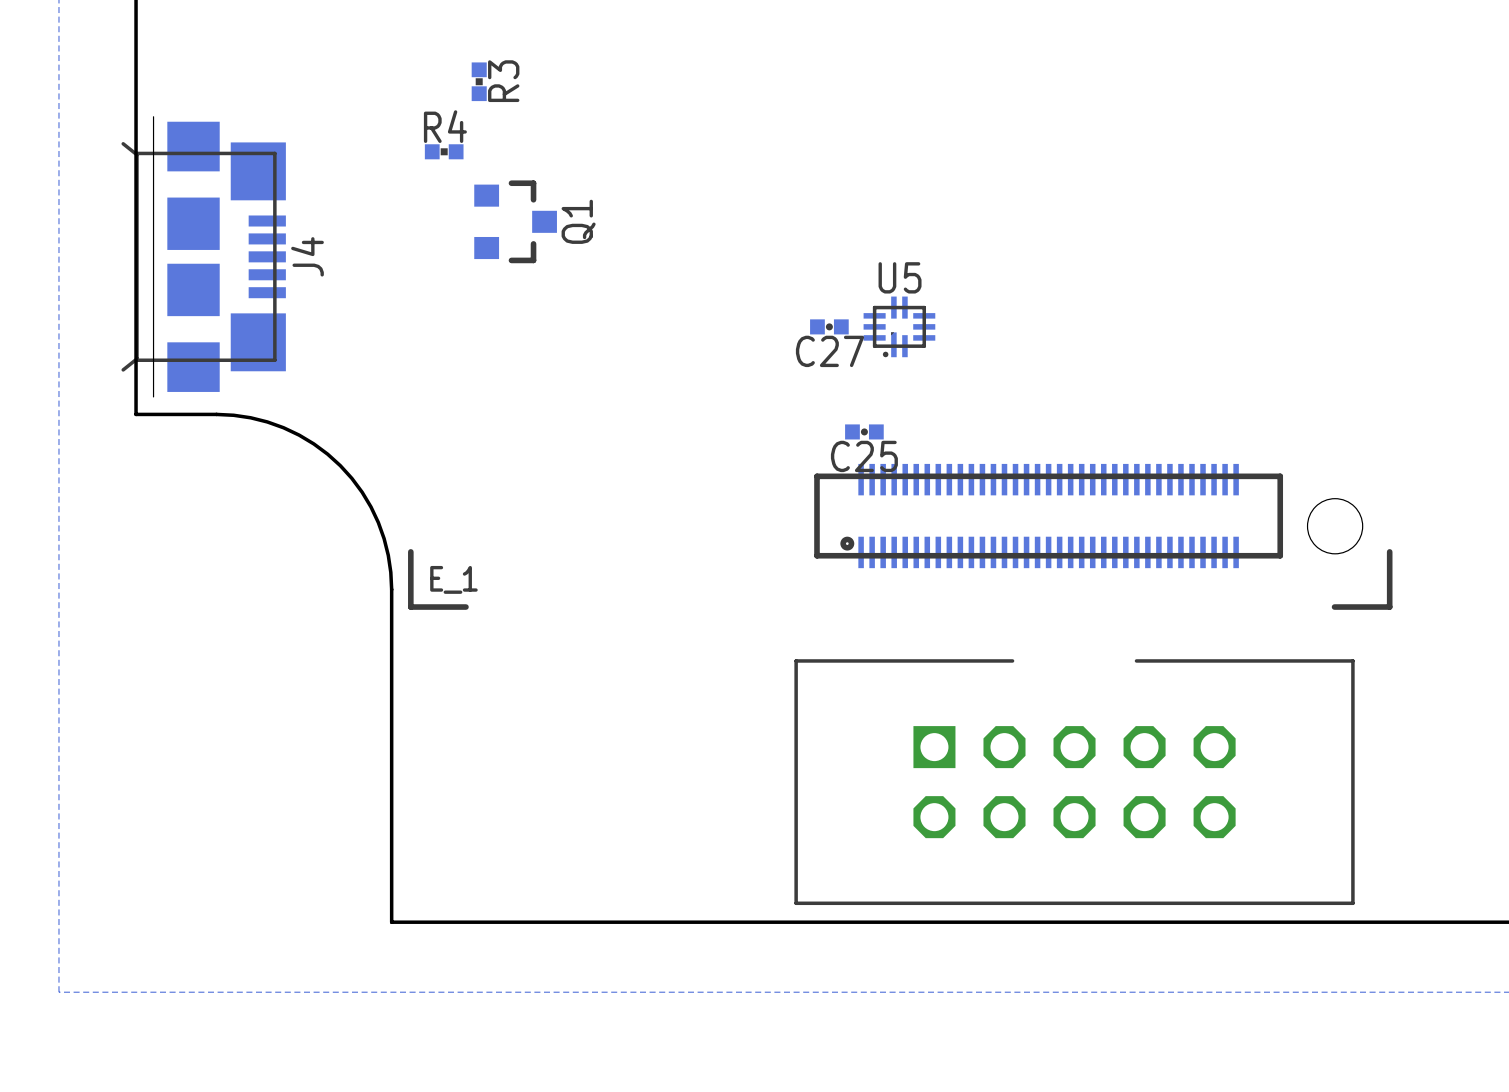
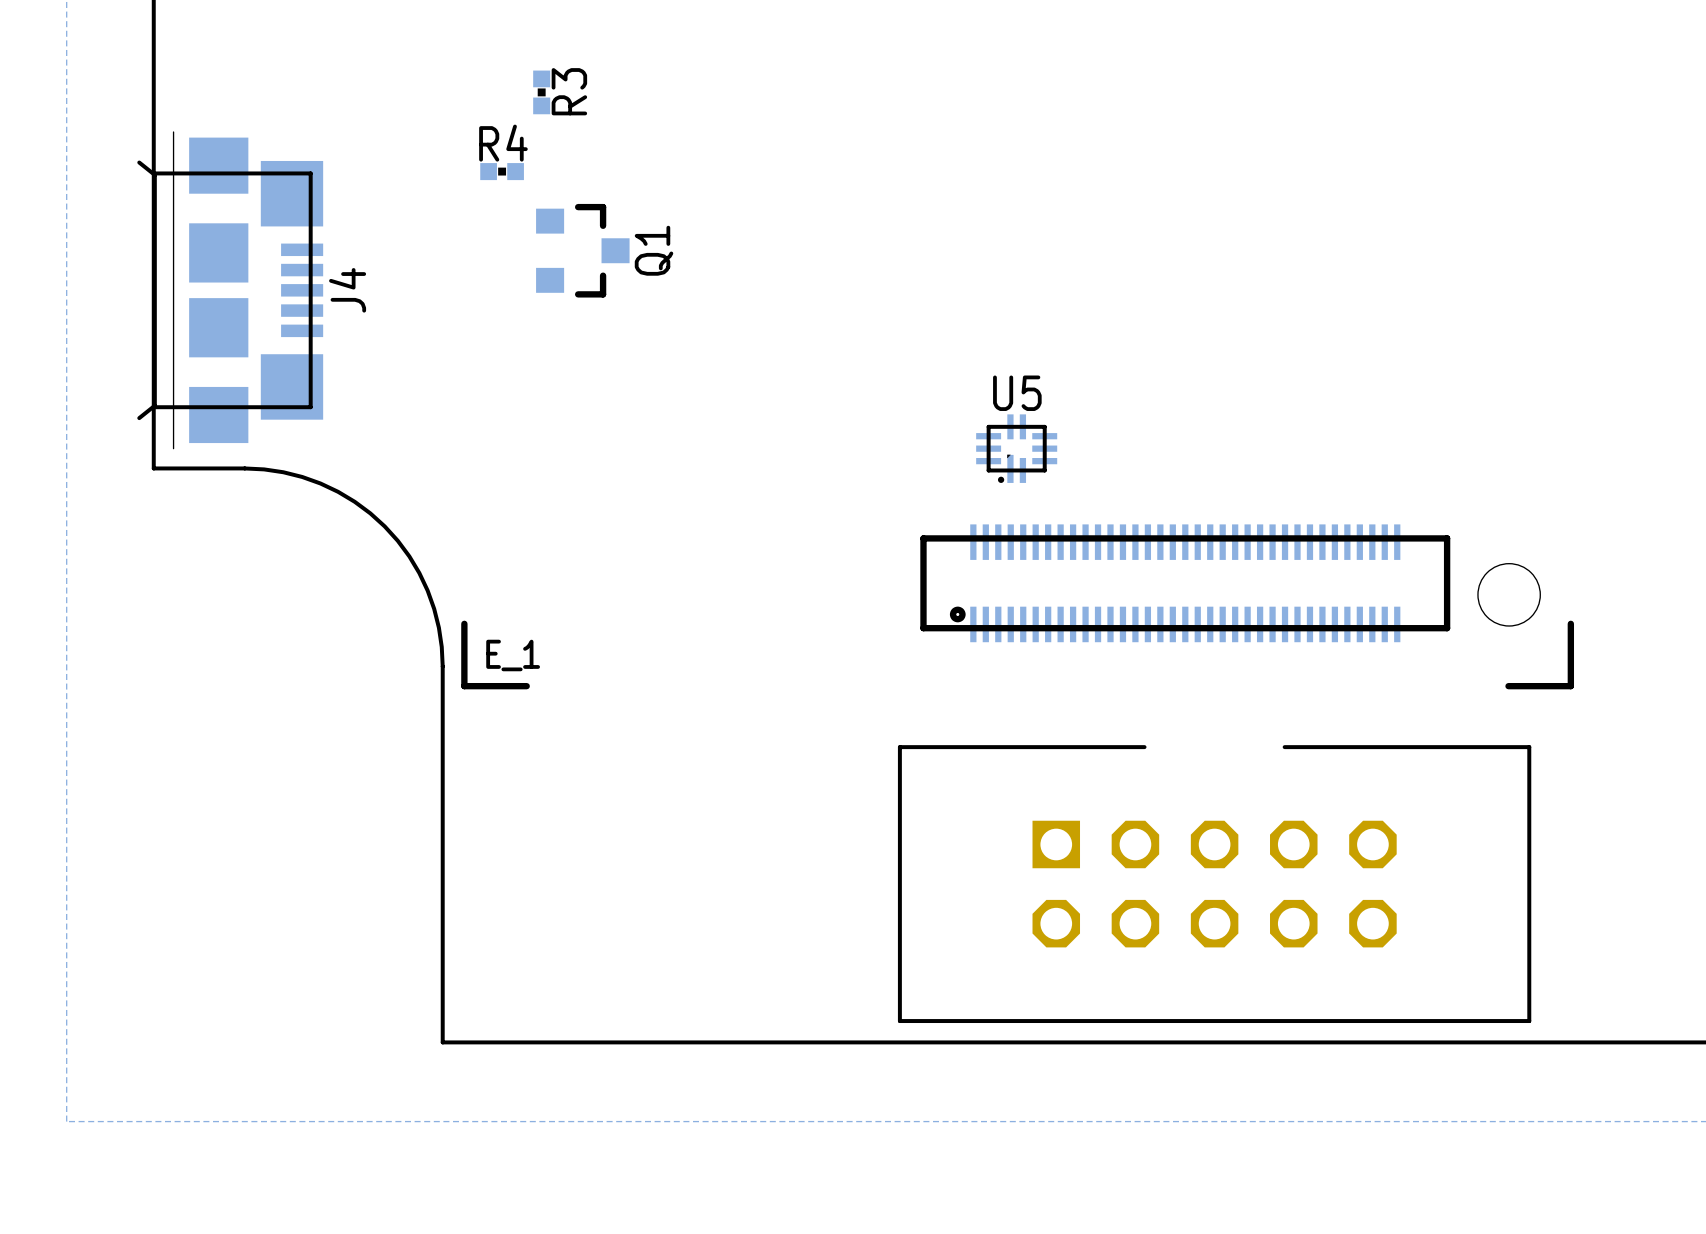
C27: (829, 326) -> none
U5 position: (899, 326) -> (1016, 448)
C25: (864, 431) -> none

